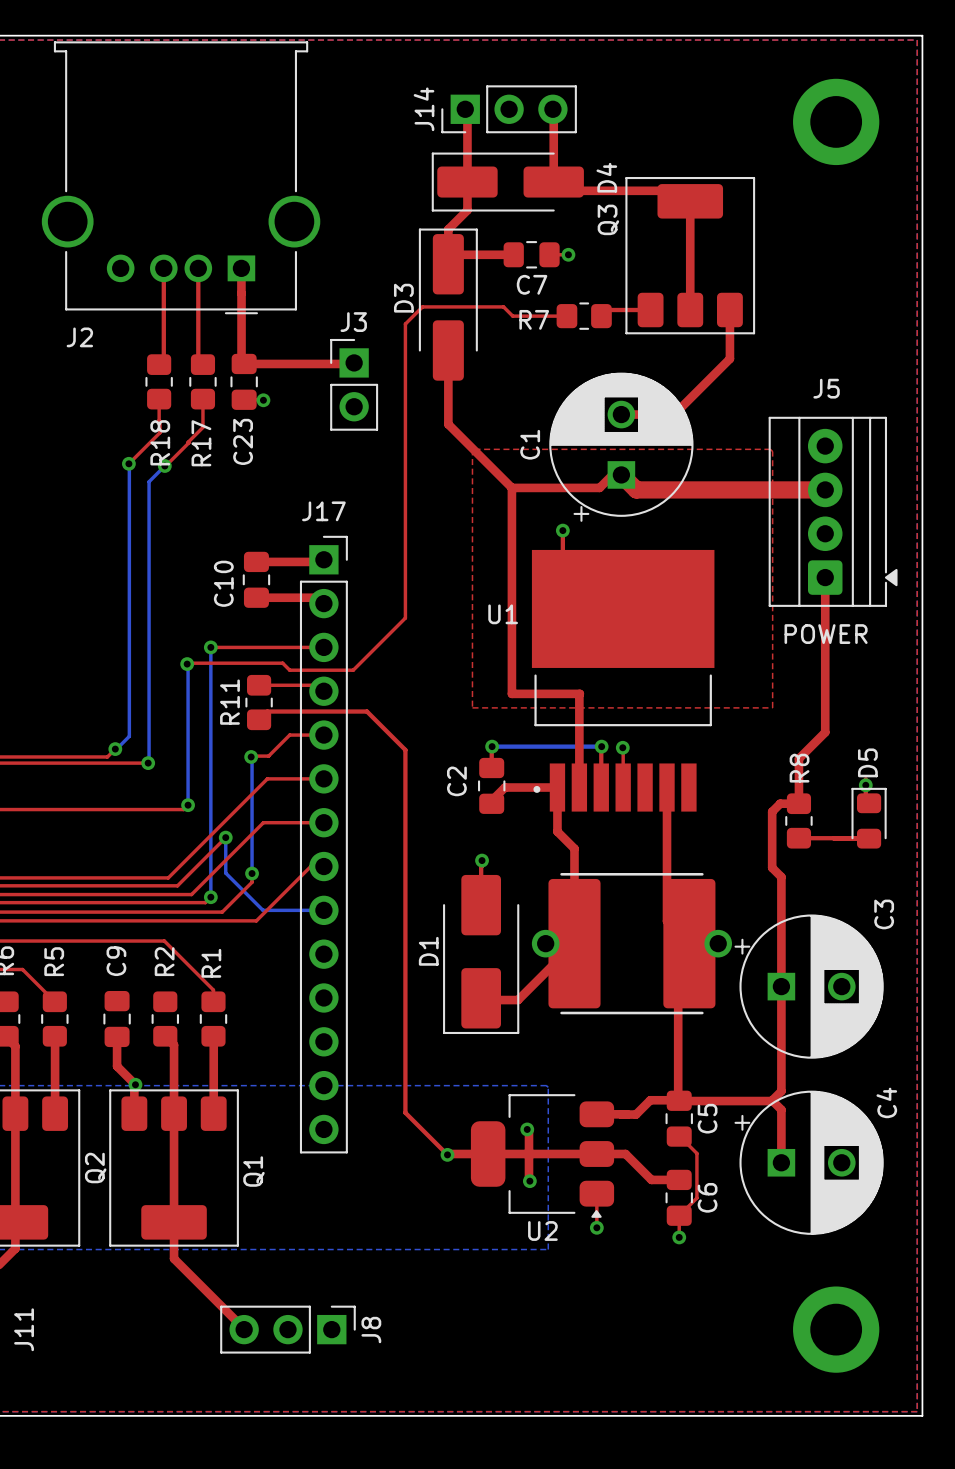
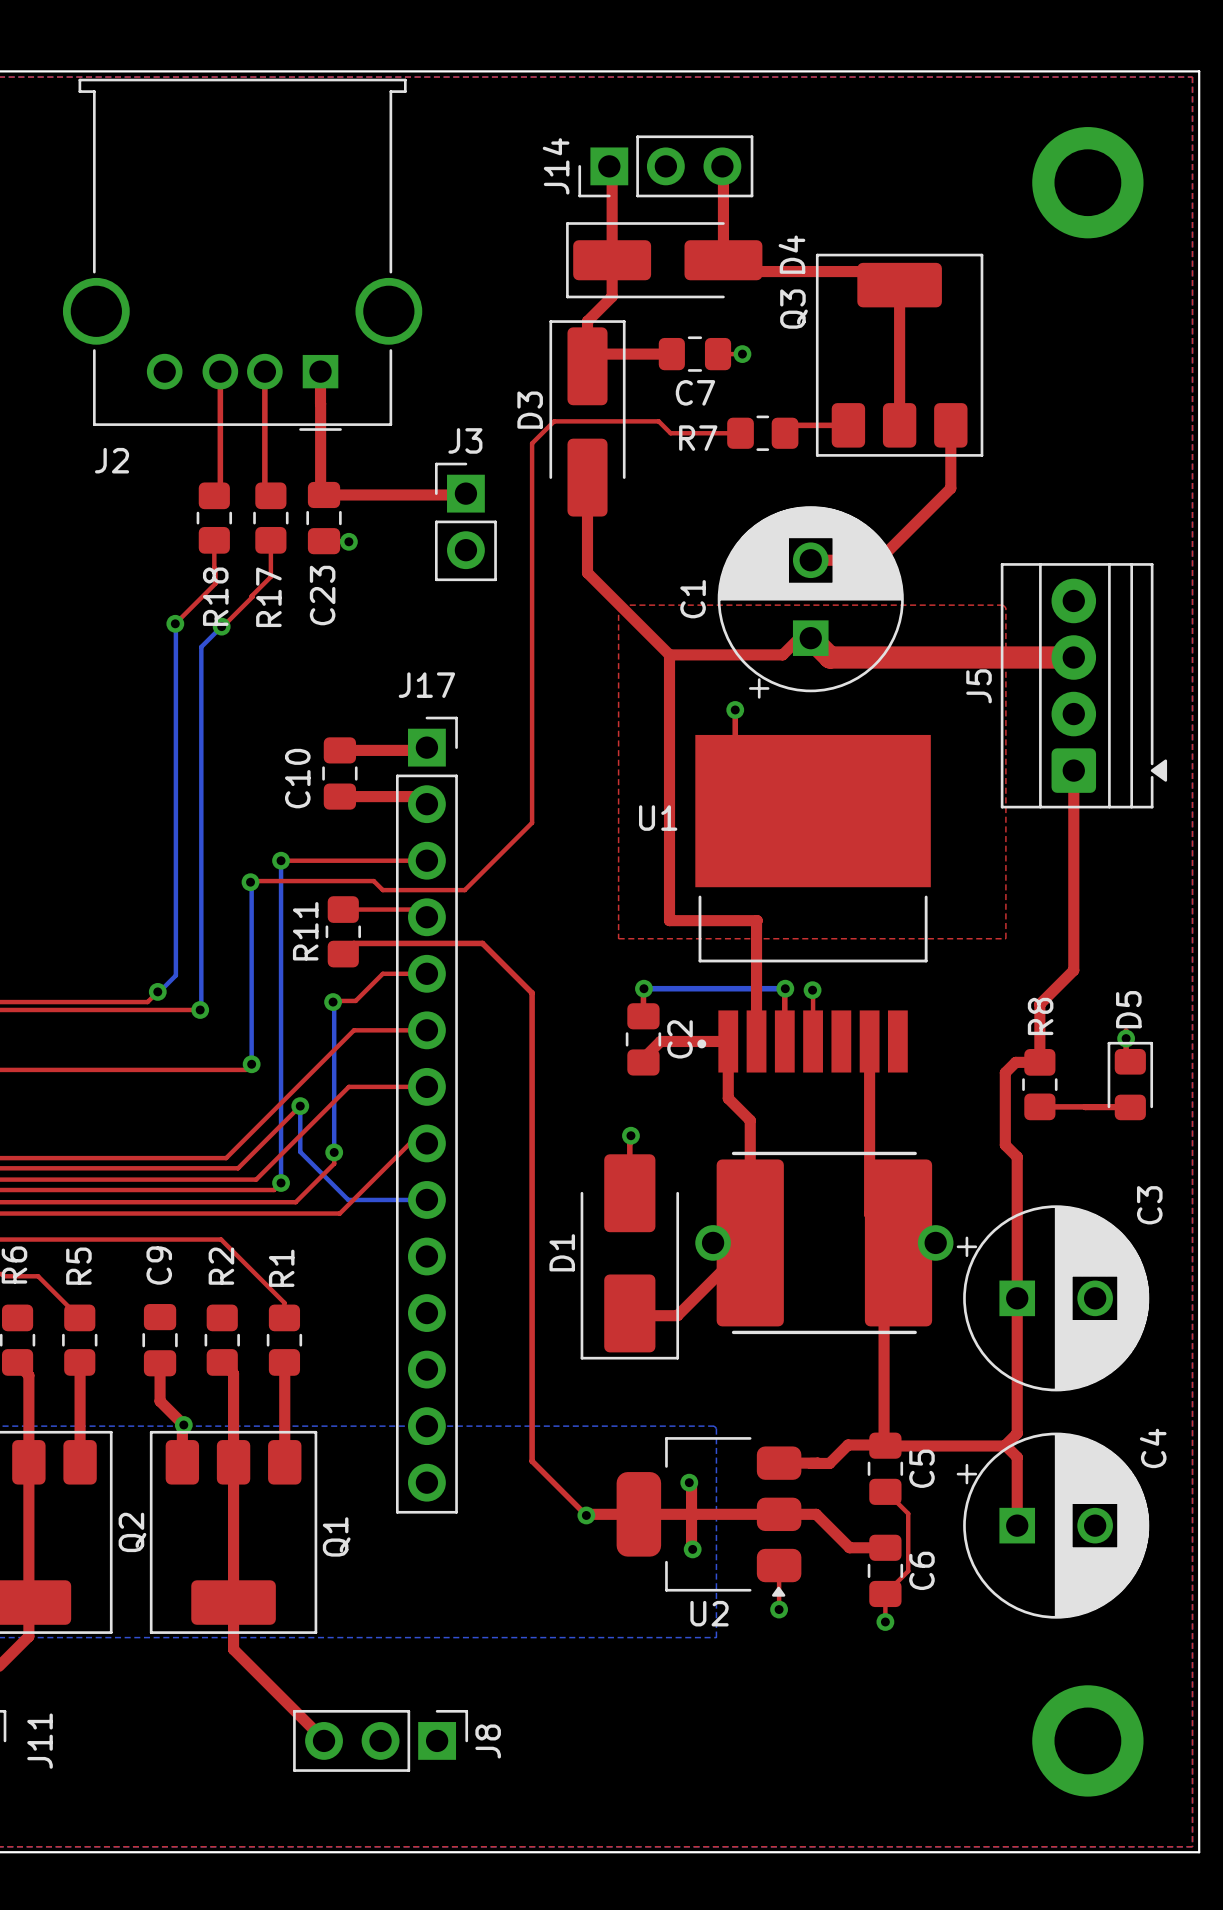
J5 name rotation: 0° (826, 388) -> 90° counterclockwise (979, 686)
J5 name position: J5 (826, 388) -> J5 (979, 686)
J5 value: POWER (826, 634) -> none
C2 name position: C2 (456, 781) -> C2 (680, 1039)

